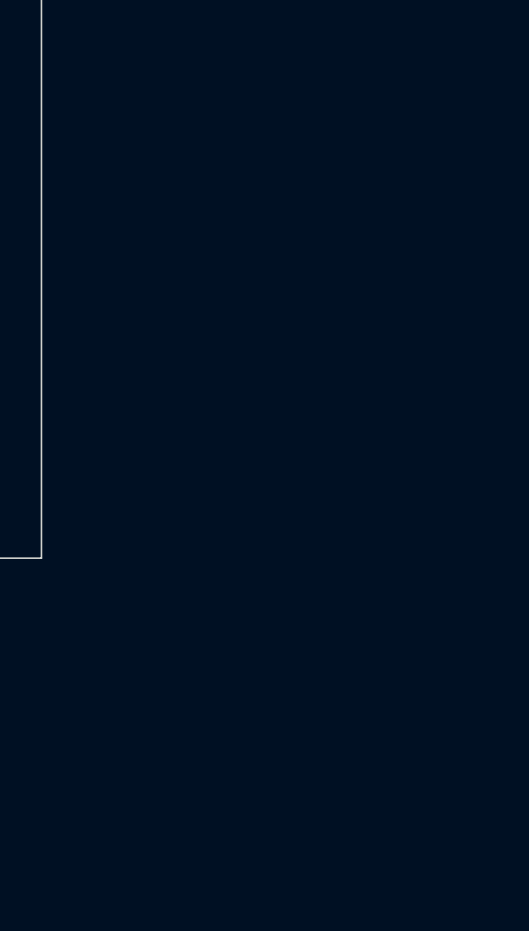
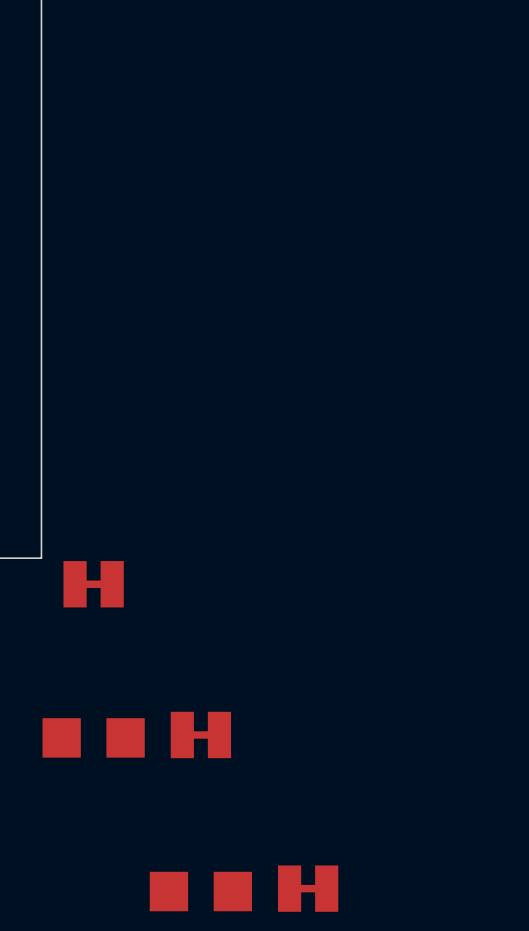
part: none -> (93, 584)
part: none -> (200, 734)
part: none -> (93, 737)
part: none -> (308, 888)
part: none -> (200, 891)

